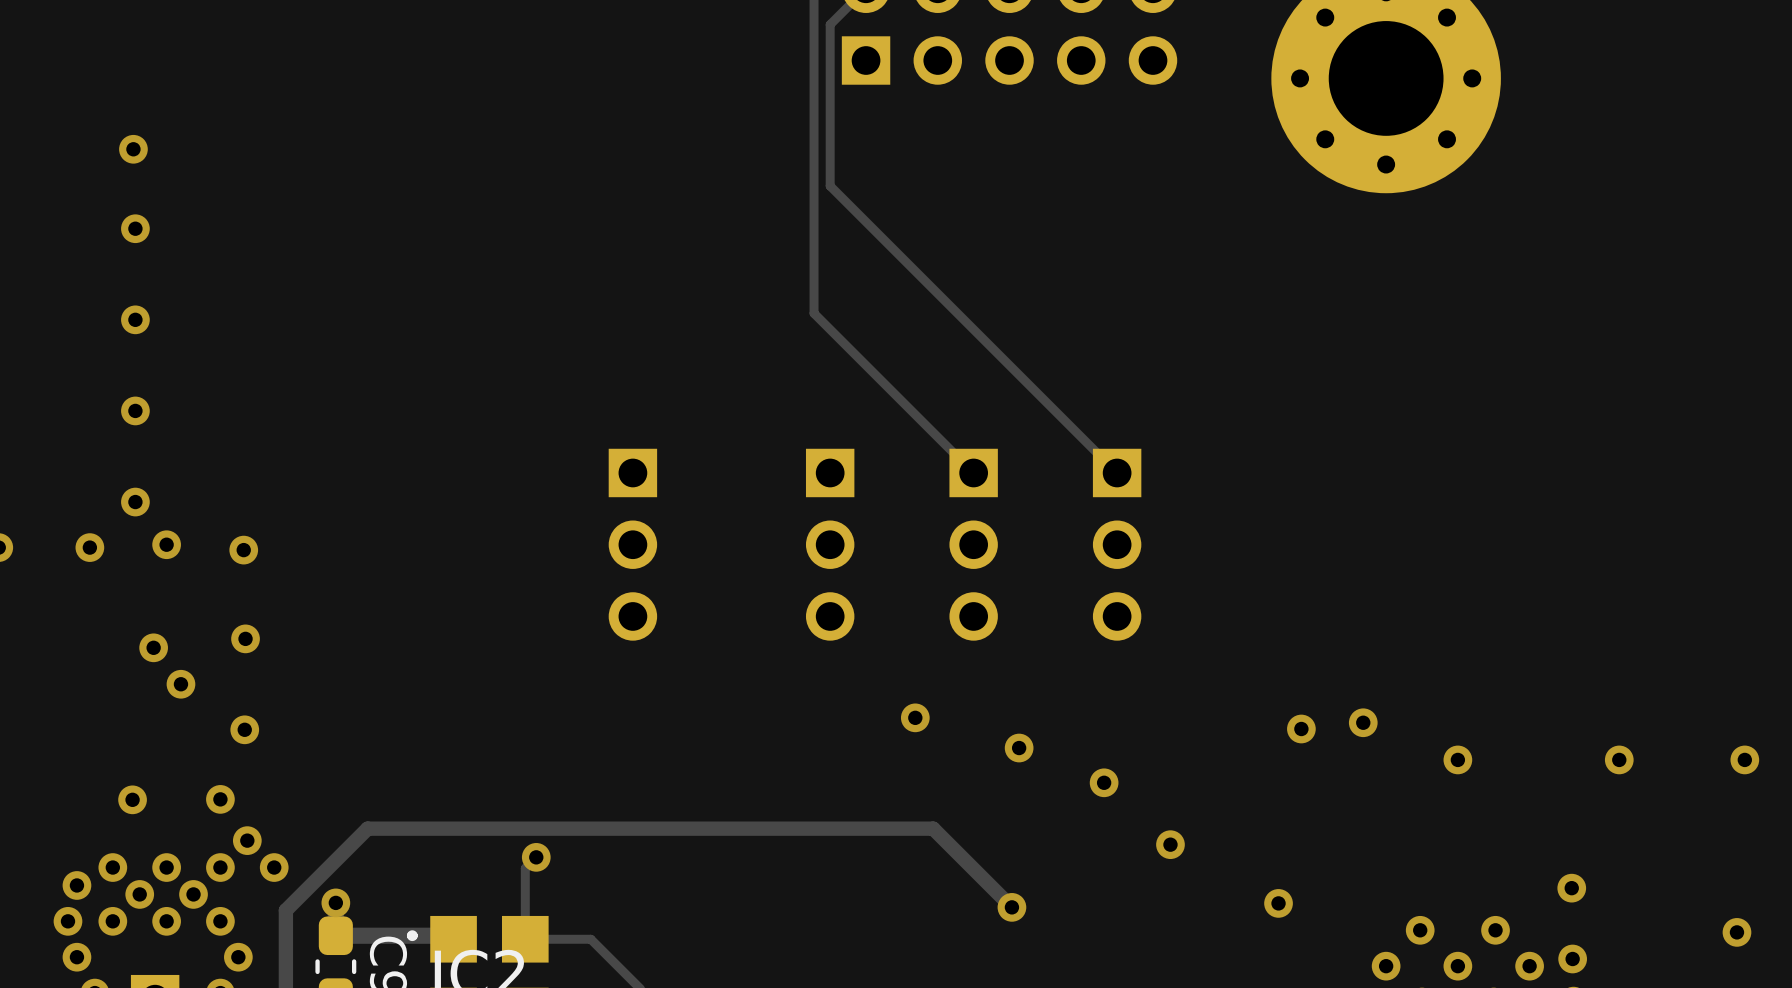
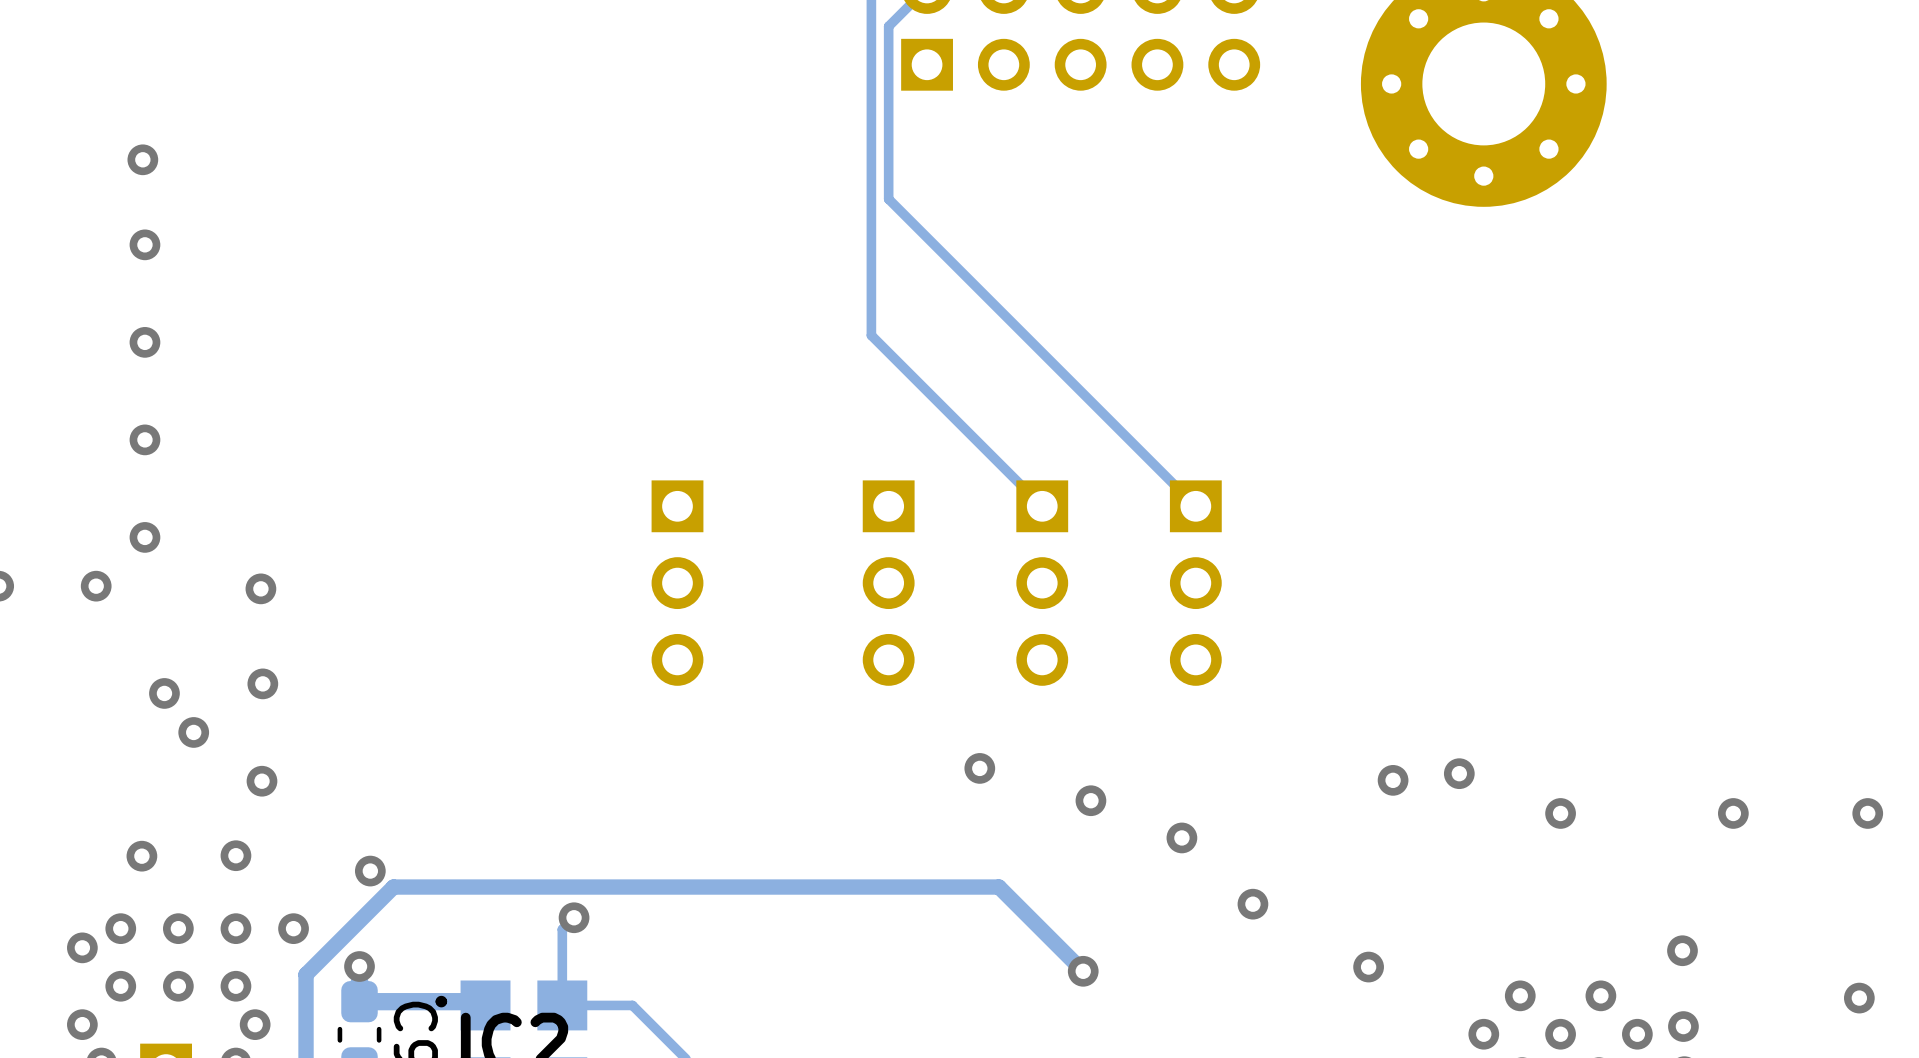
via: (166, 544) -> none
via: none -> (370, 871)
via: (247, 840) -> none
via: (139, 894) -> none
via: (193, 894) -> none
via: (67, 921) -> none

